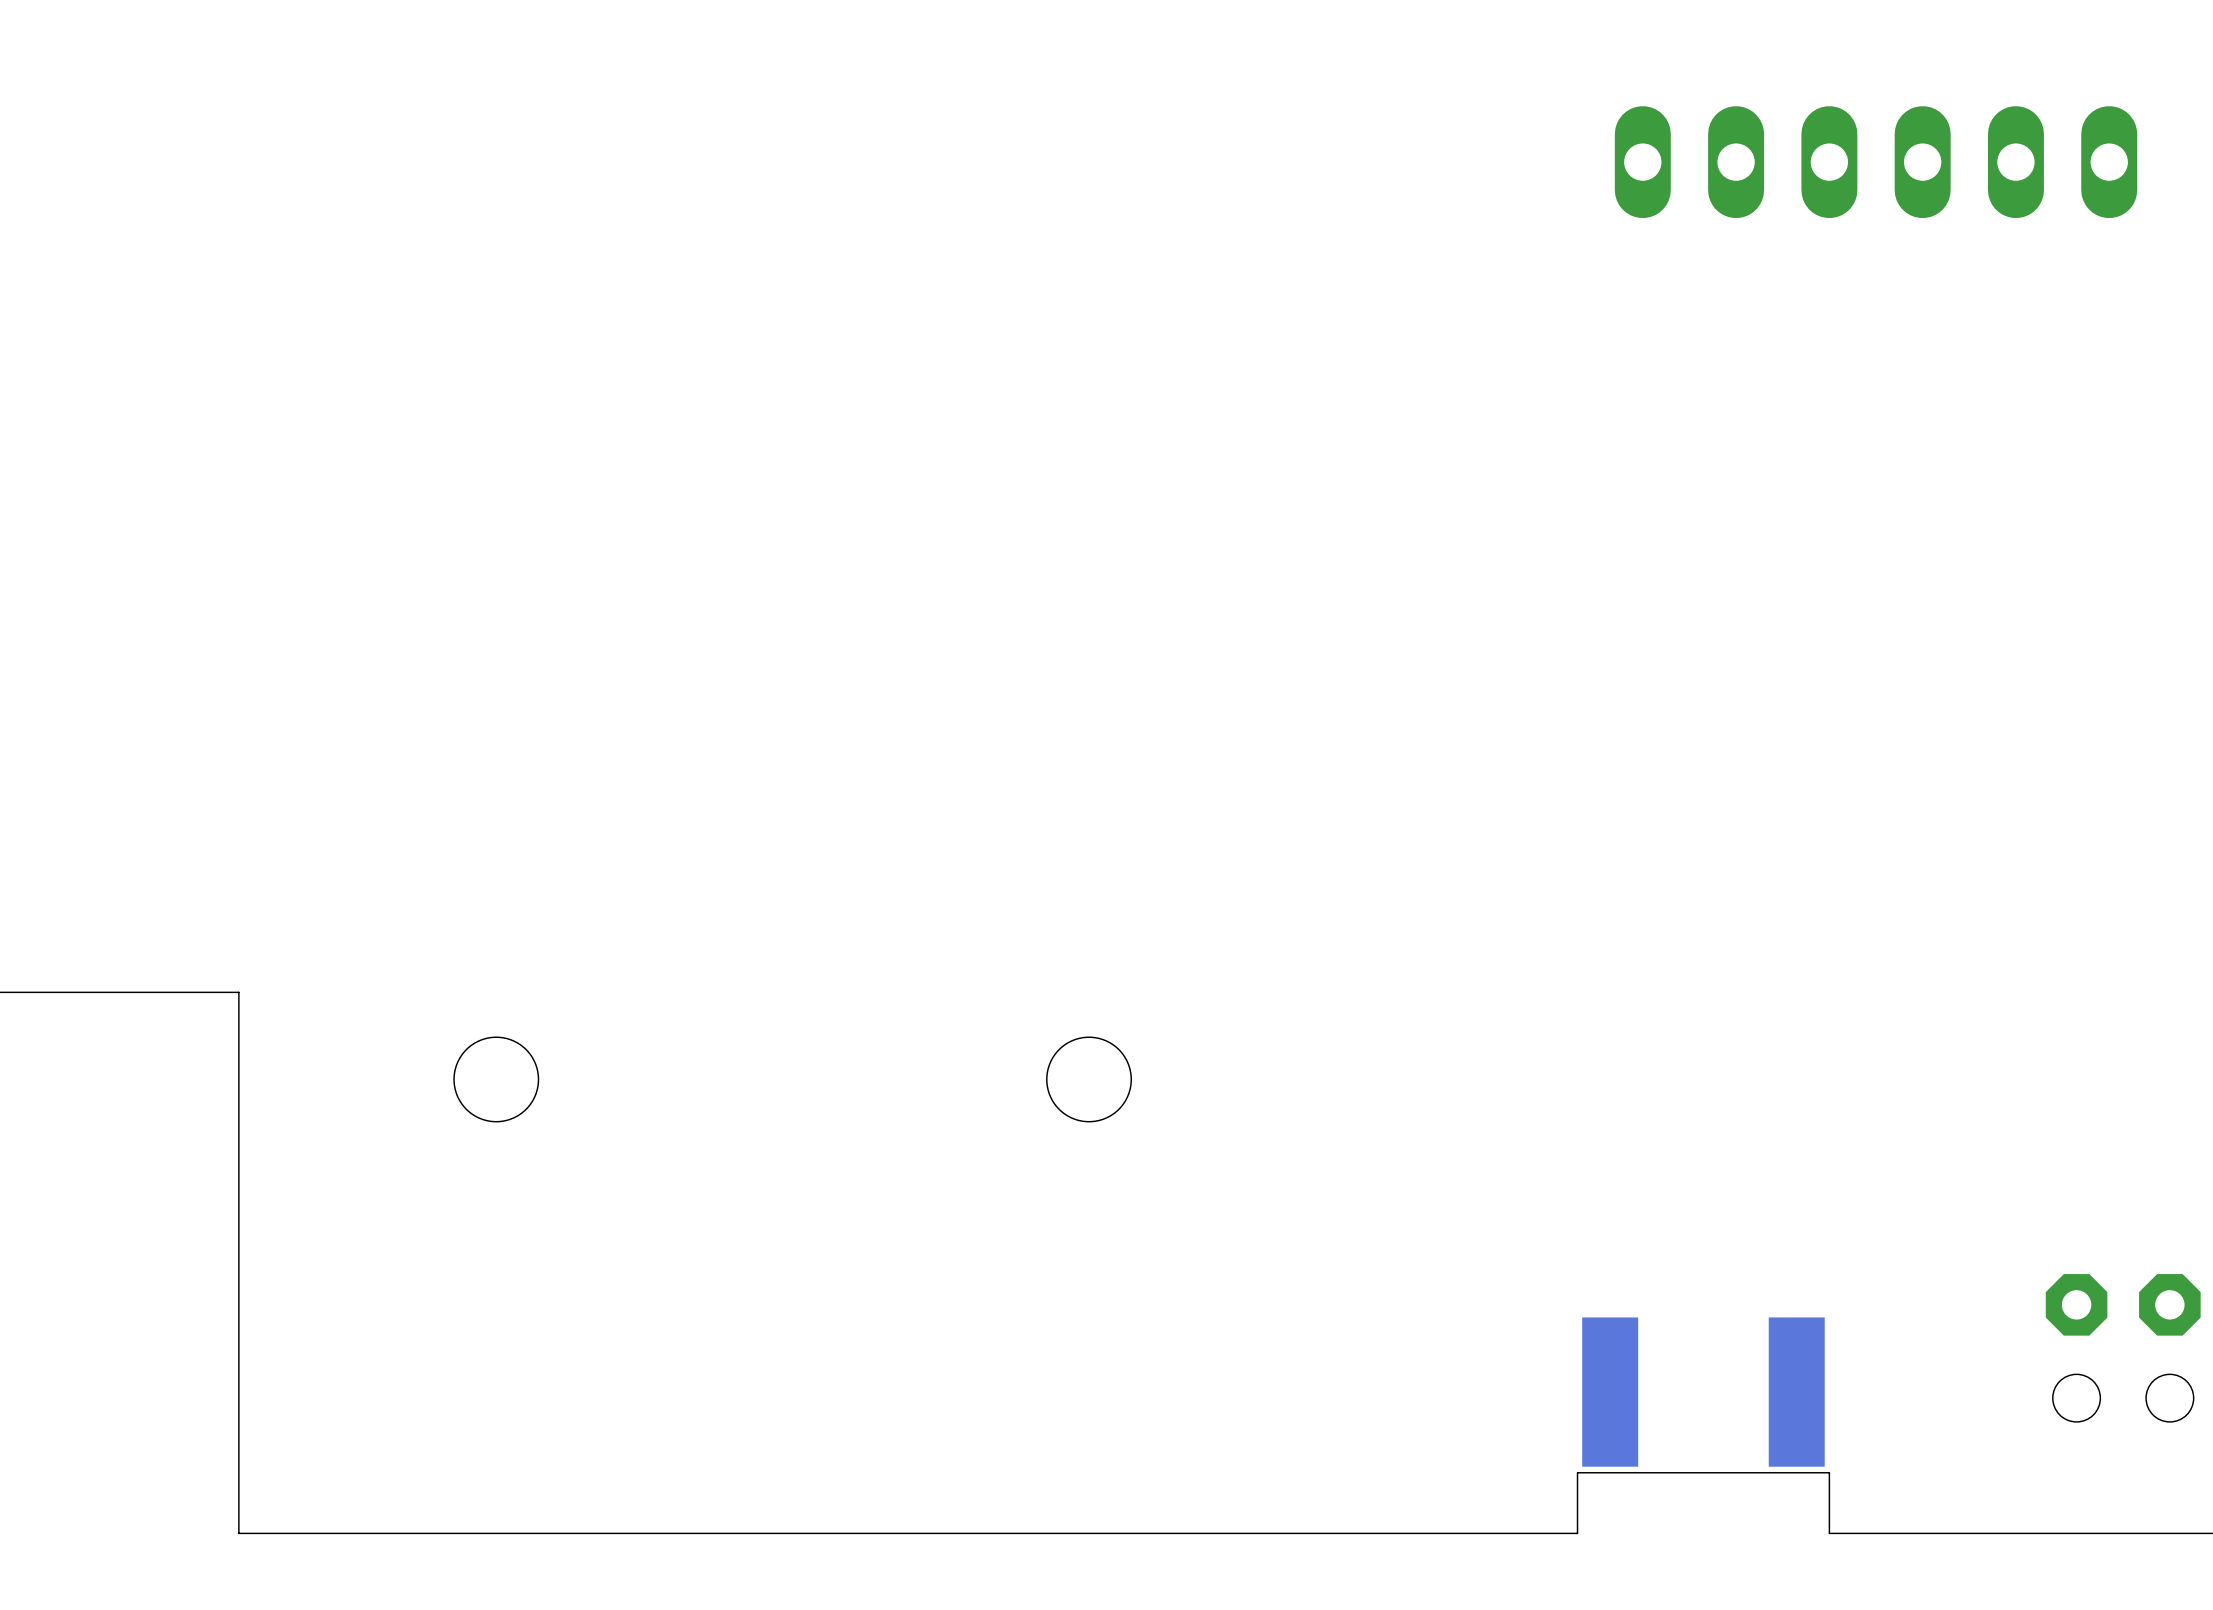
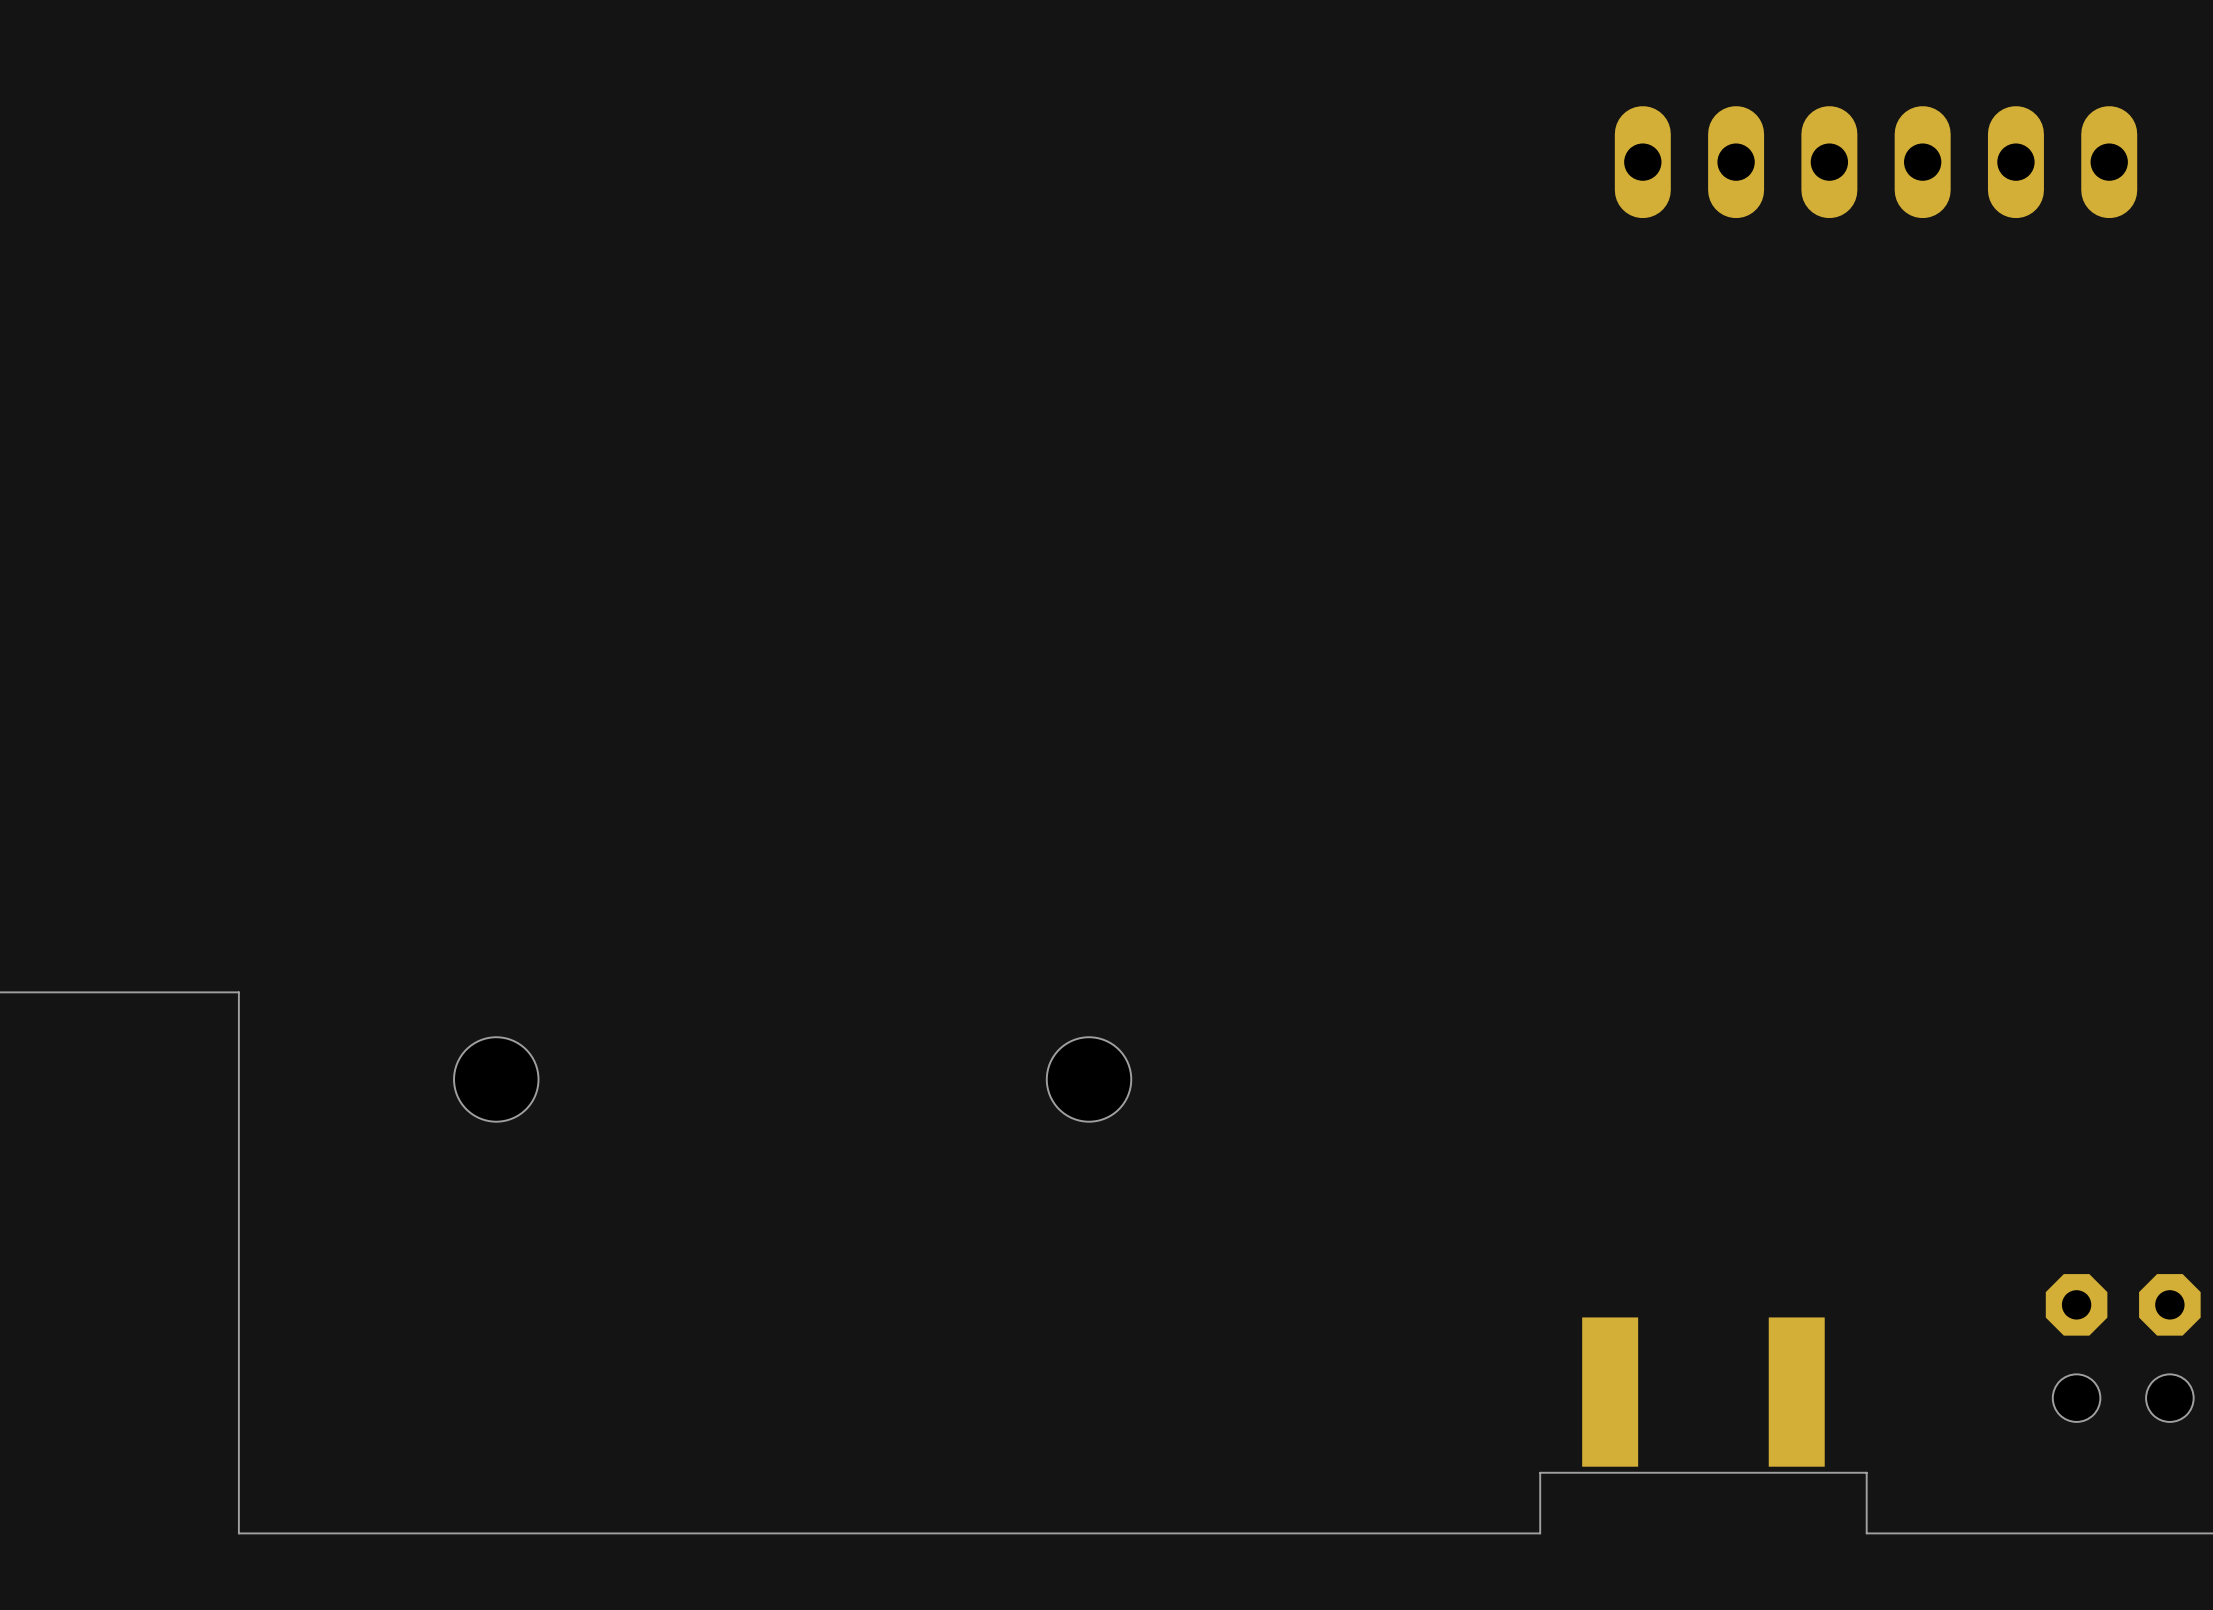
board edge: (1577, 1472) (1577, 1533) (1540, 1533) -> (1577, 1472) (1540, 1472) (1540, 1533)
board edge: (1829, 1472) (1829, 1533) (1866, 1533) -> (1829, 1472) (1866, 1472) (1866, 1533)

